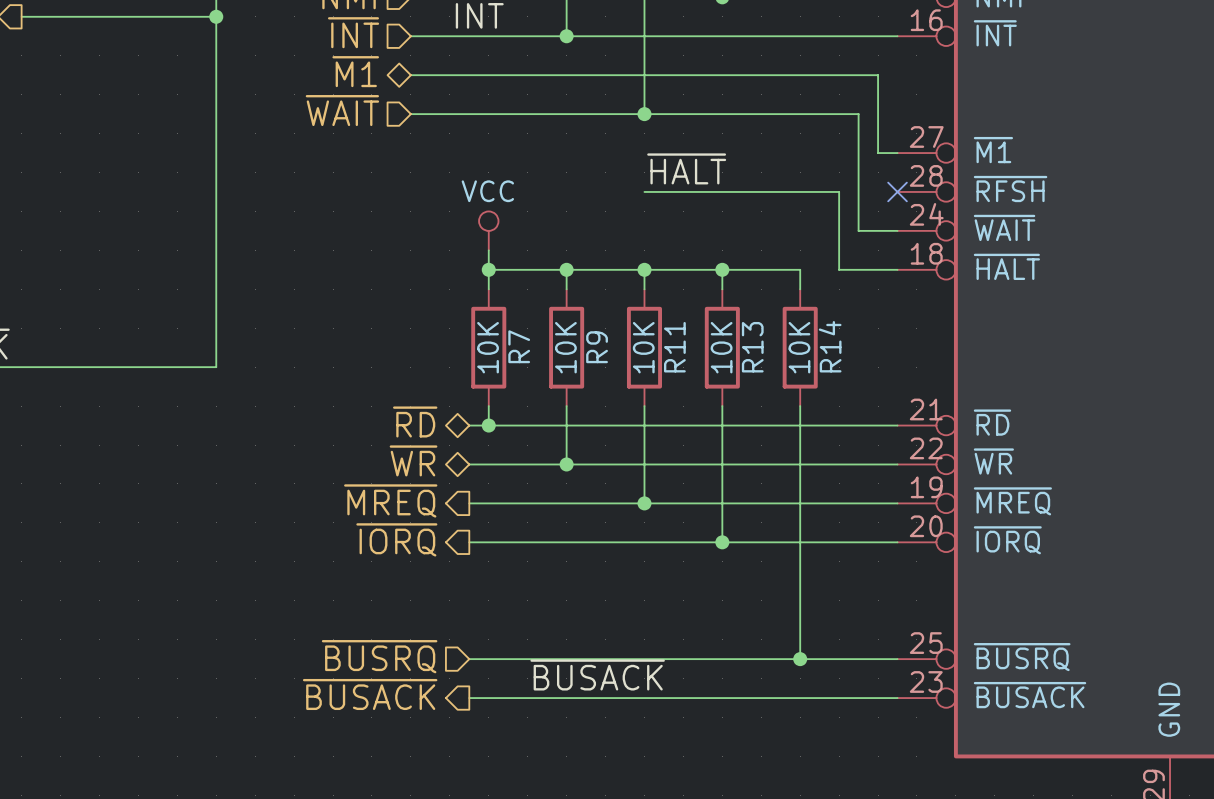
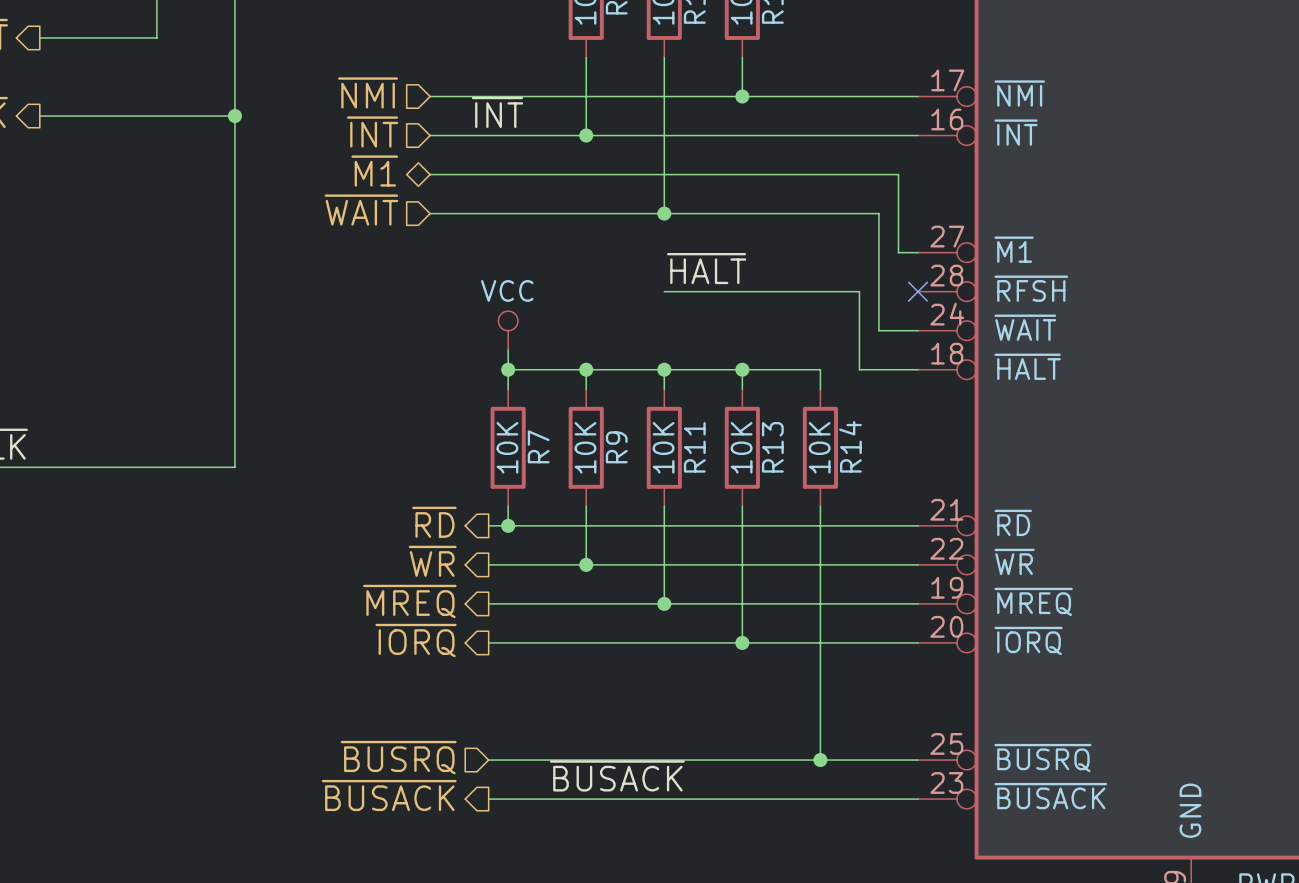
hierarchical label shape: bidirectional (415, 421) -> output (434, 522)
hierarchical label shape: bidirectional (413, 460) -> output (432, 561)

